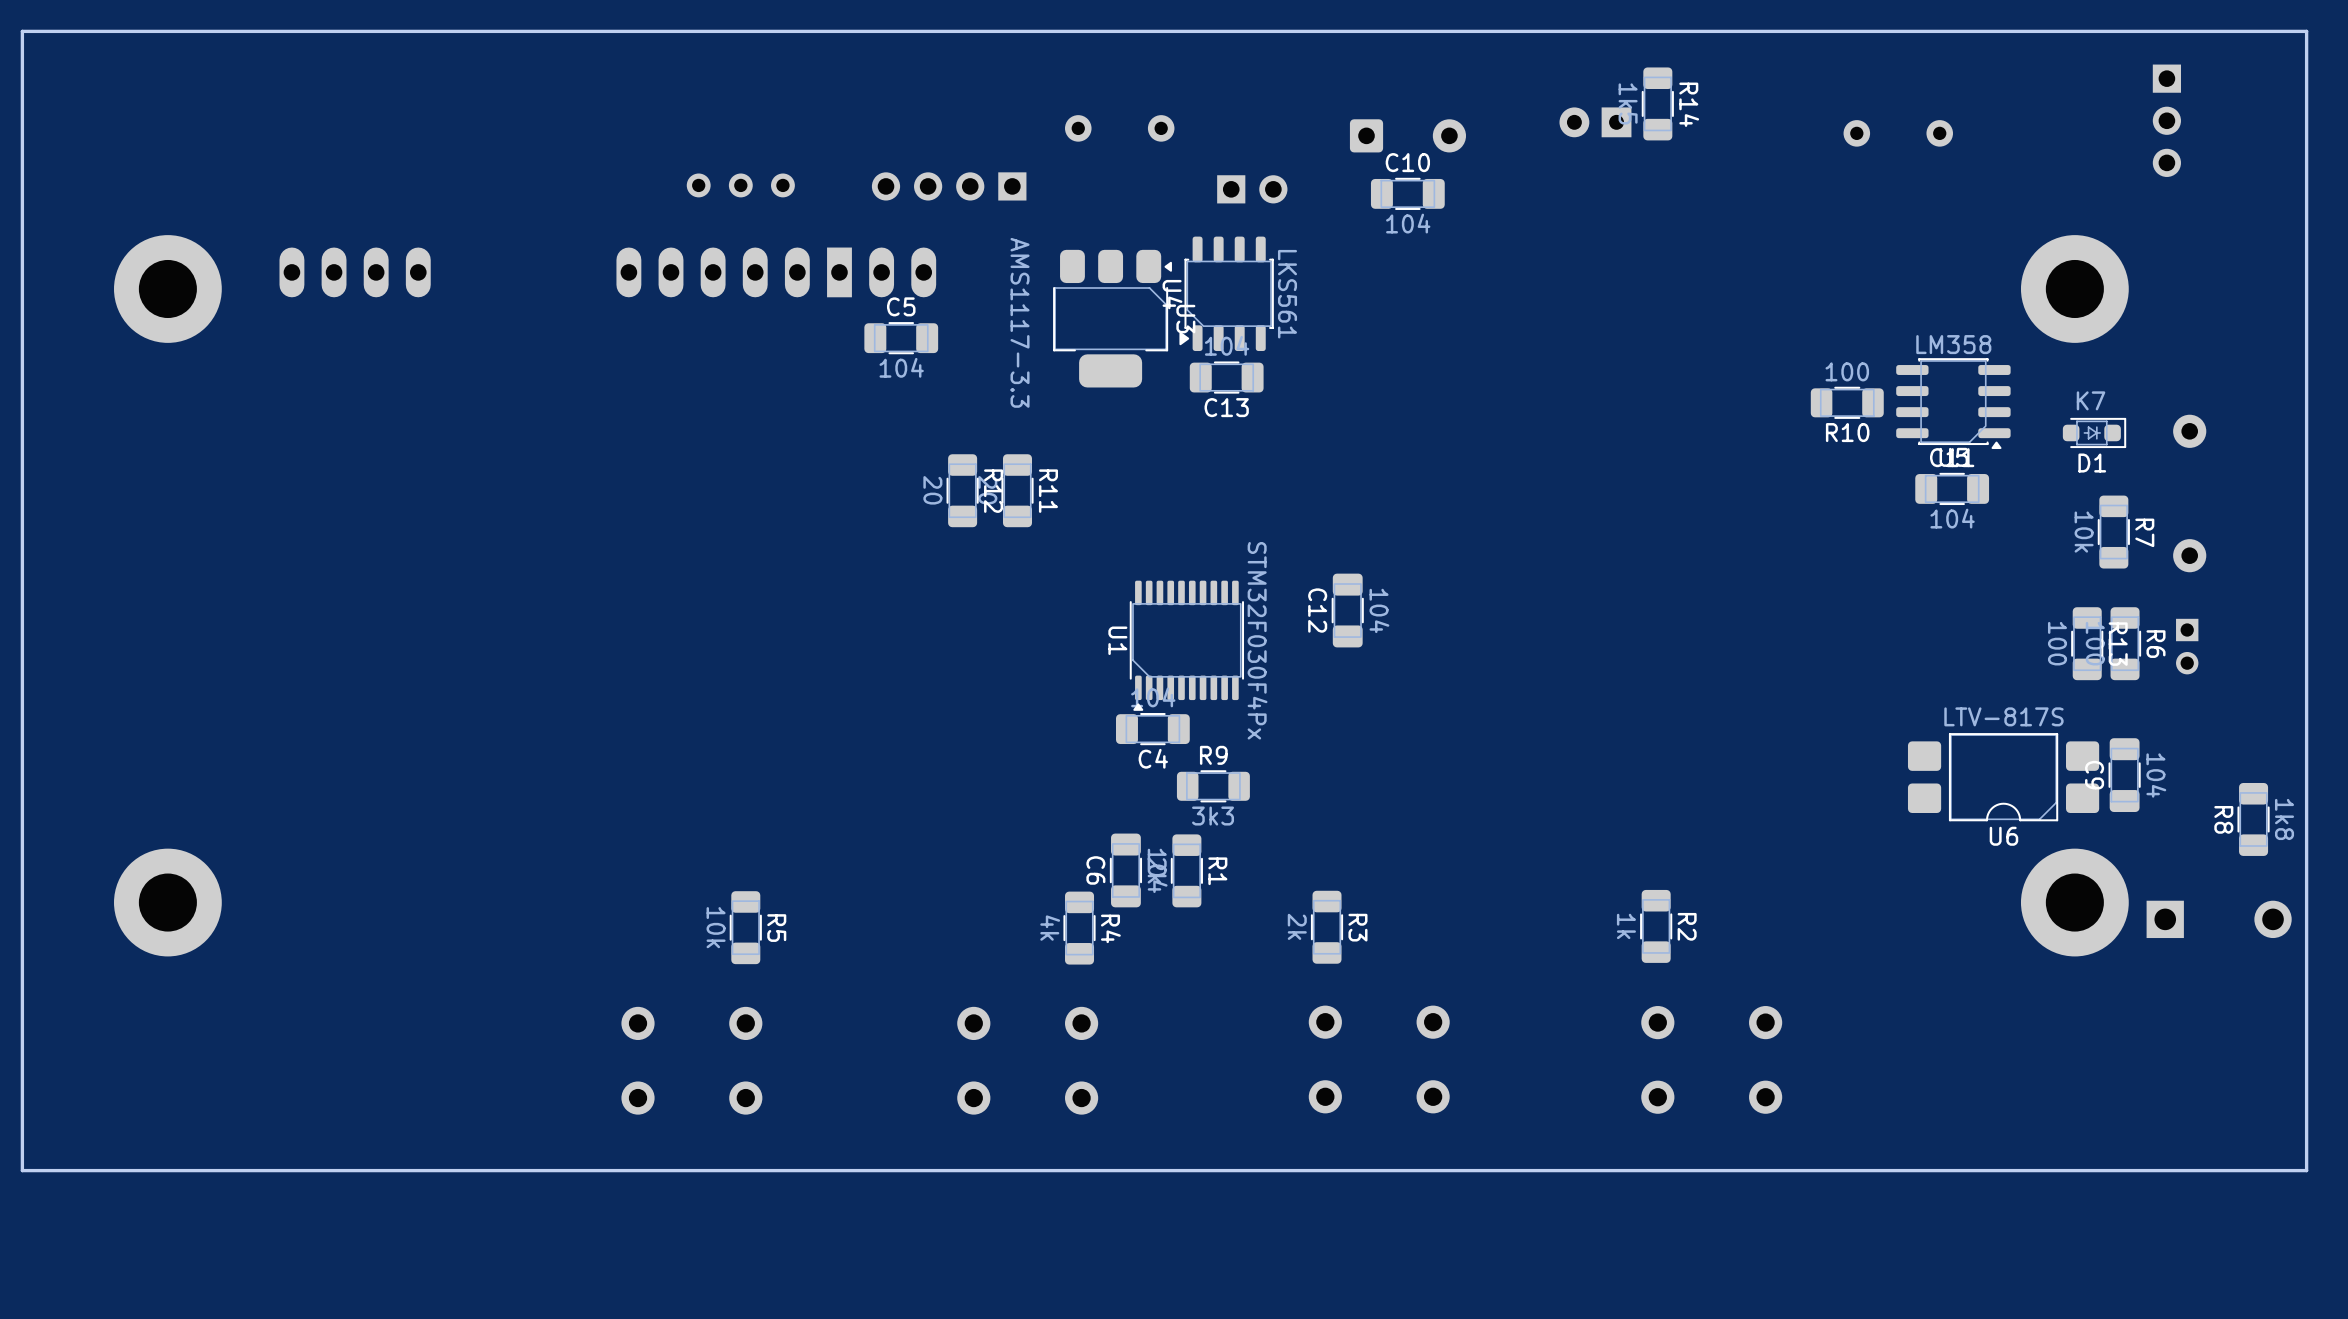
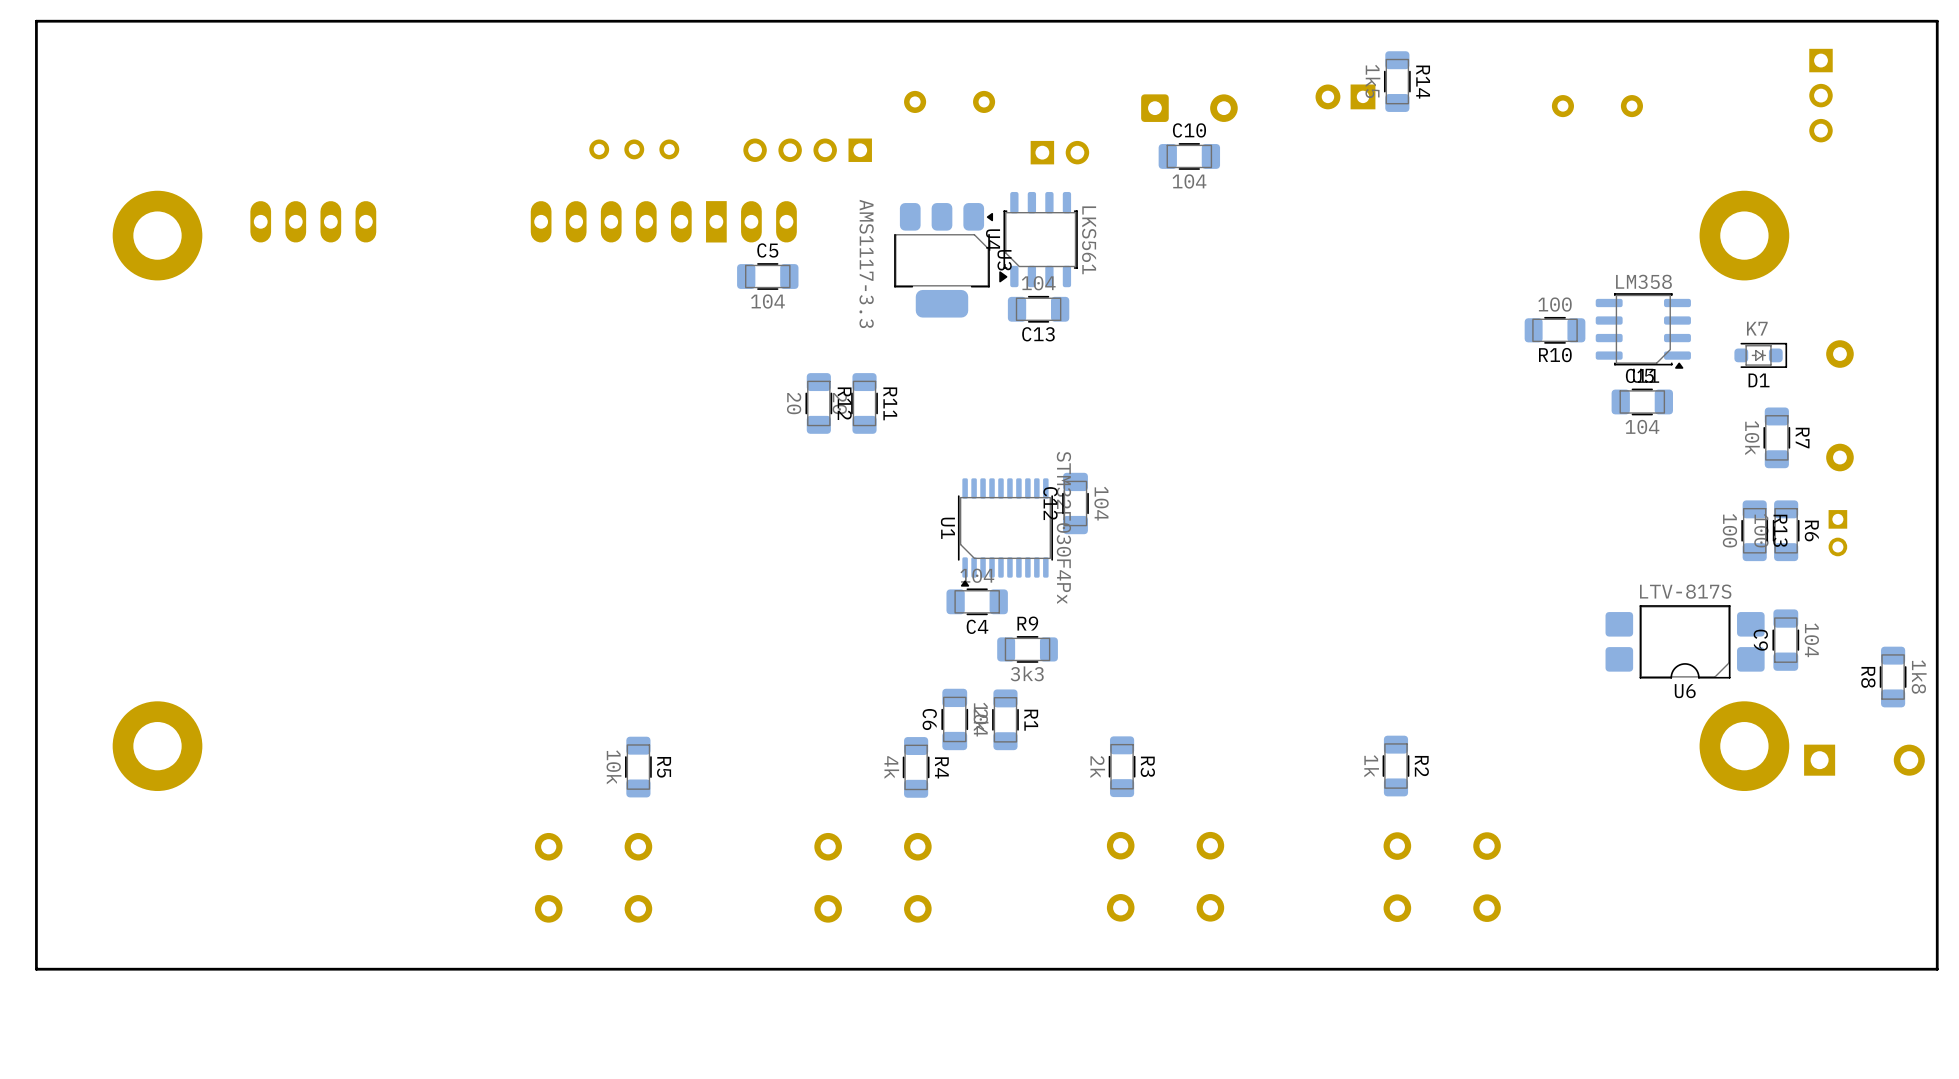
C12 position: (1347, 610) -> (1075, 503)

